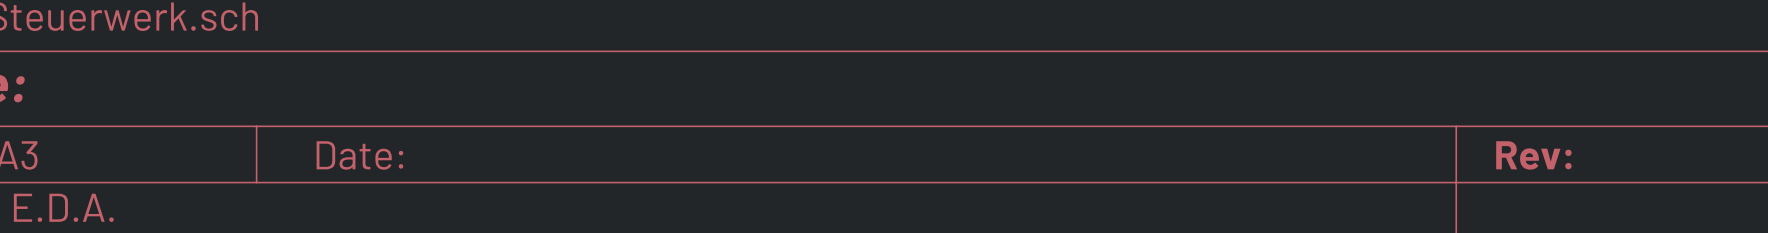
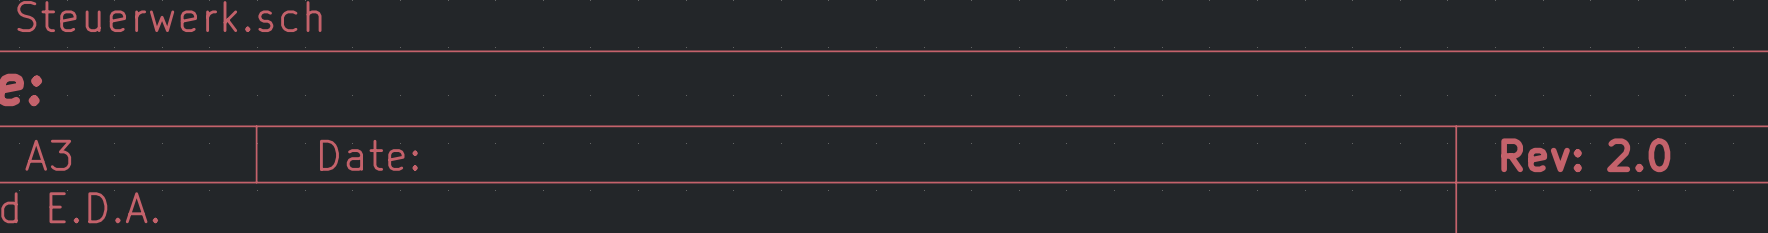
title block: Rev: (1533, 155) -> Rev: 2.0 (1585, 155)

